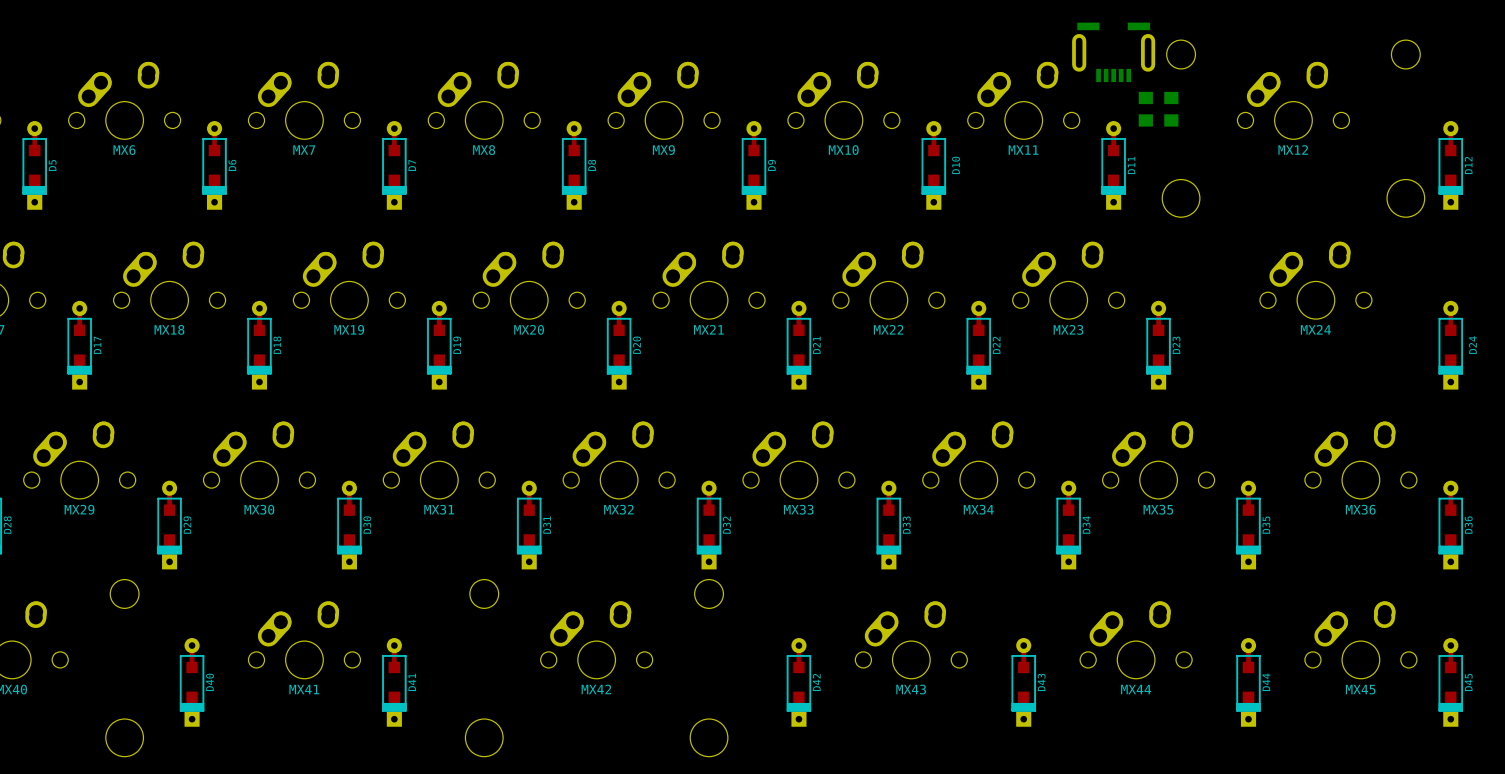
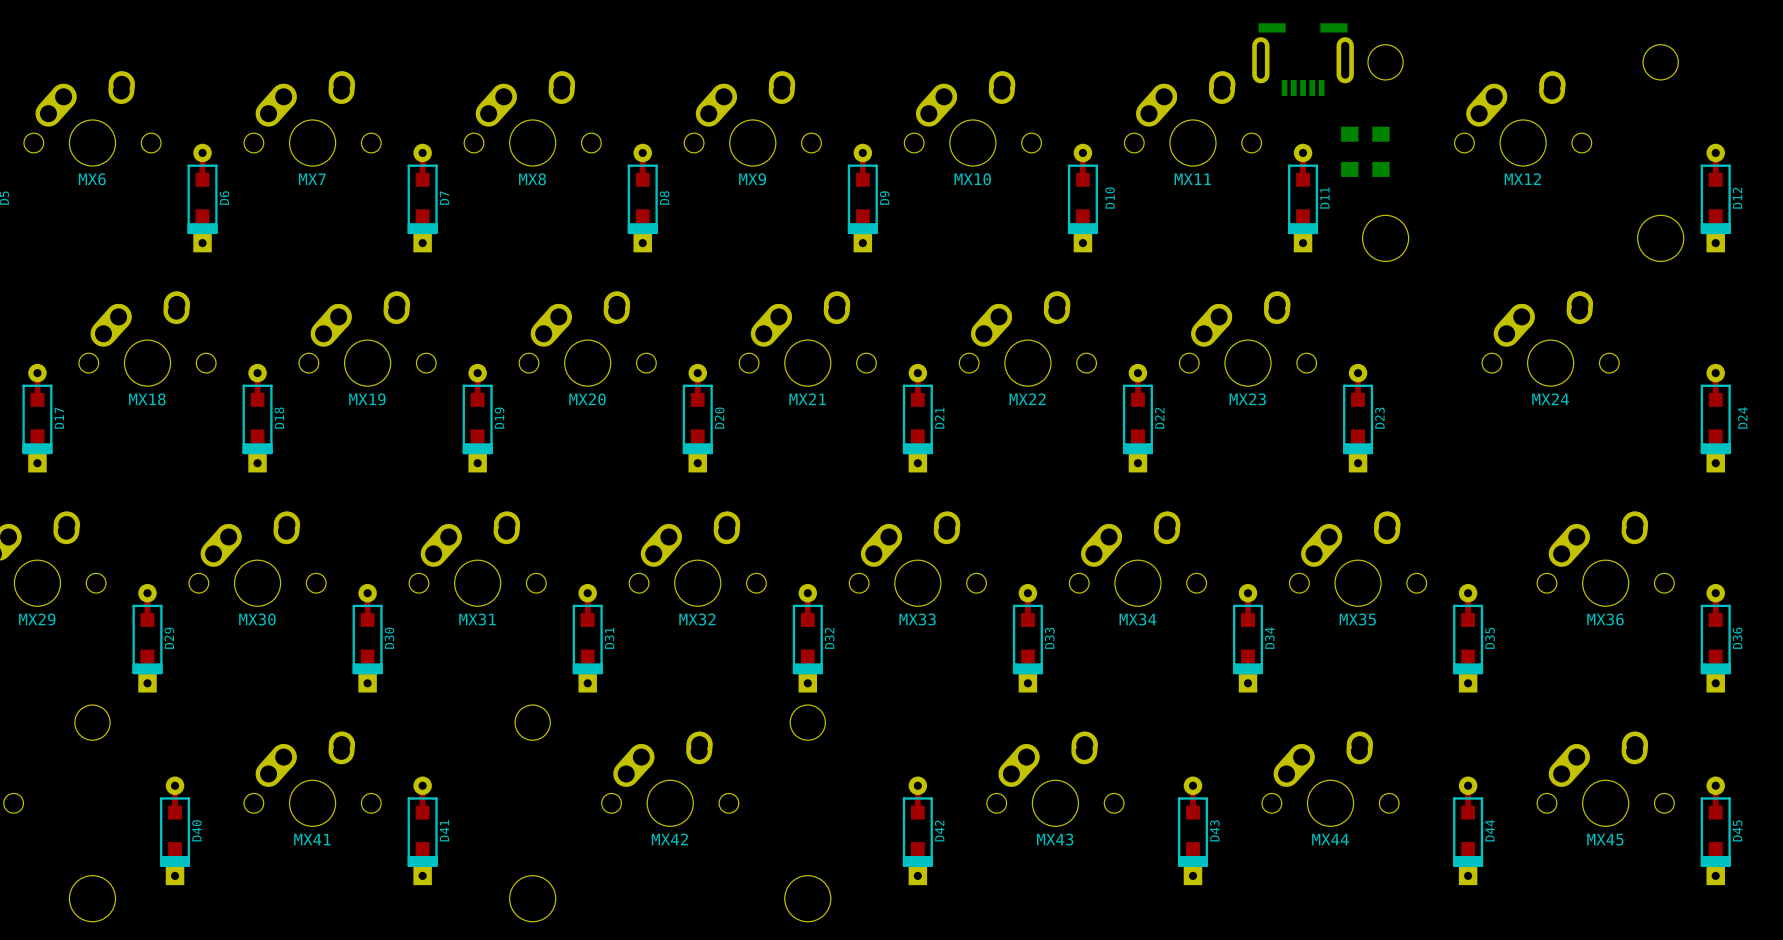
part: (1158, 97) -> none
part: none -> (1365, 134)
part: (1158, 120) -> none
part: none -> (1365, 169)

